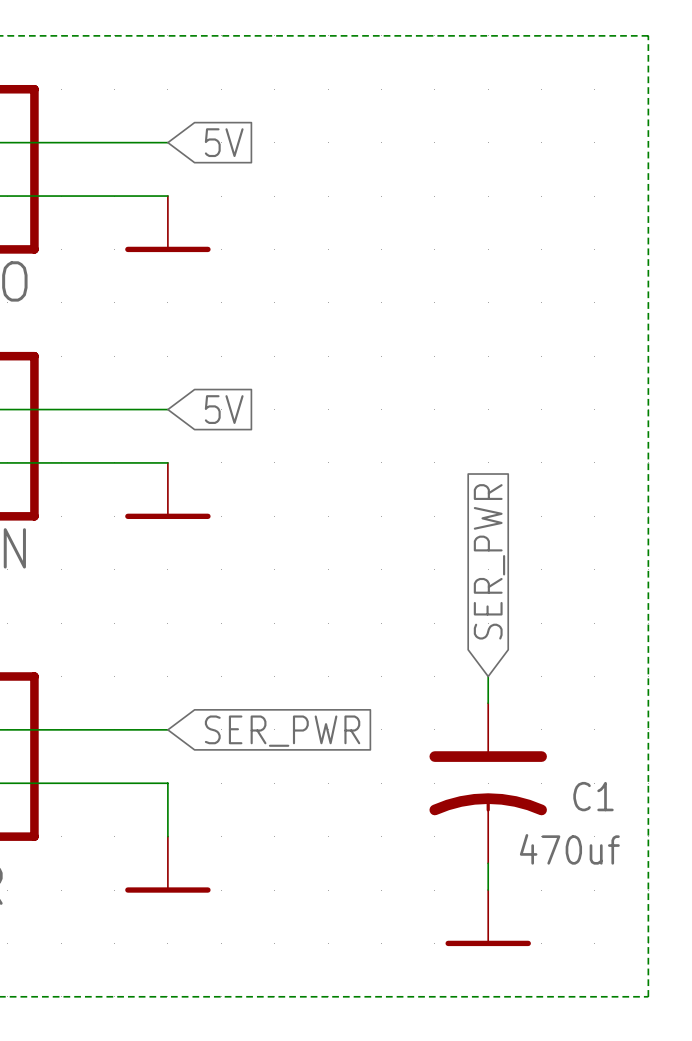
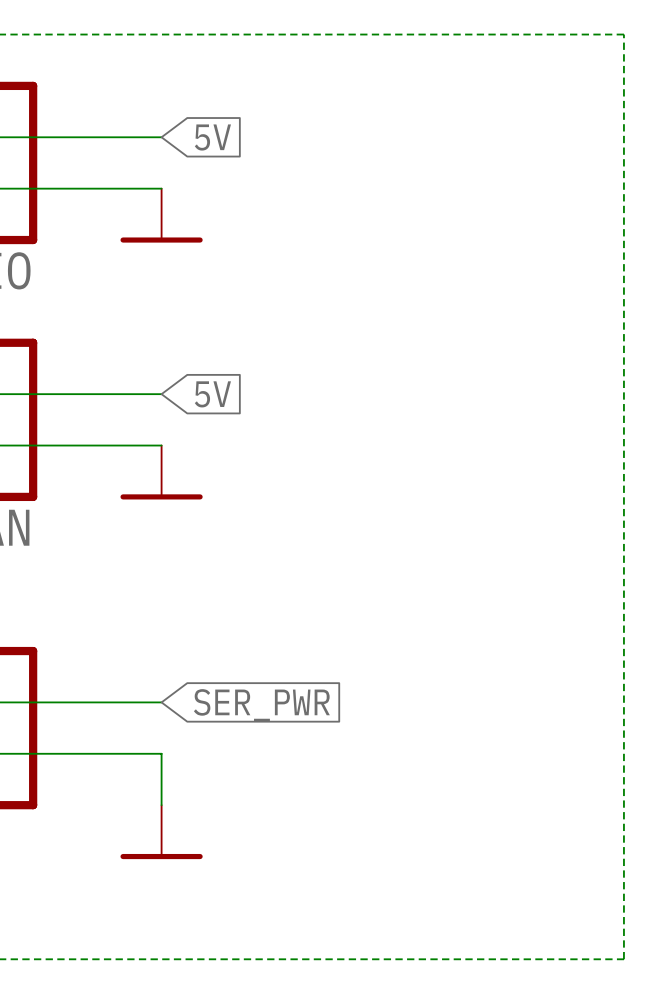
global label: SER_PWR (489, 561) -> none
wire: (488, 676) (488, 703) -> none
C1: 470uf (488, 783) -> none
wire: (488, 863) (488, 890) -> none
power symbol: (488, 918) -> none

